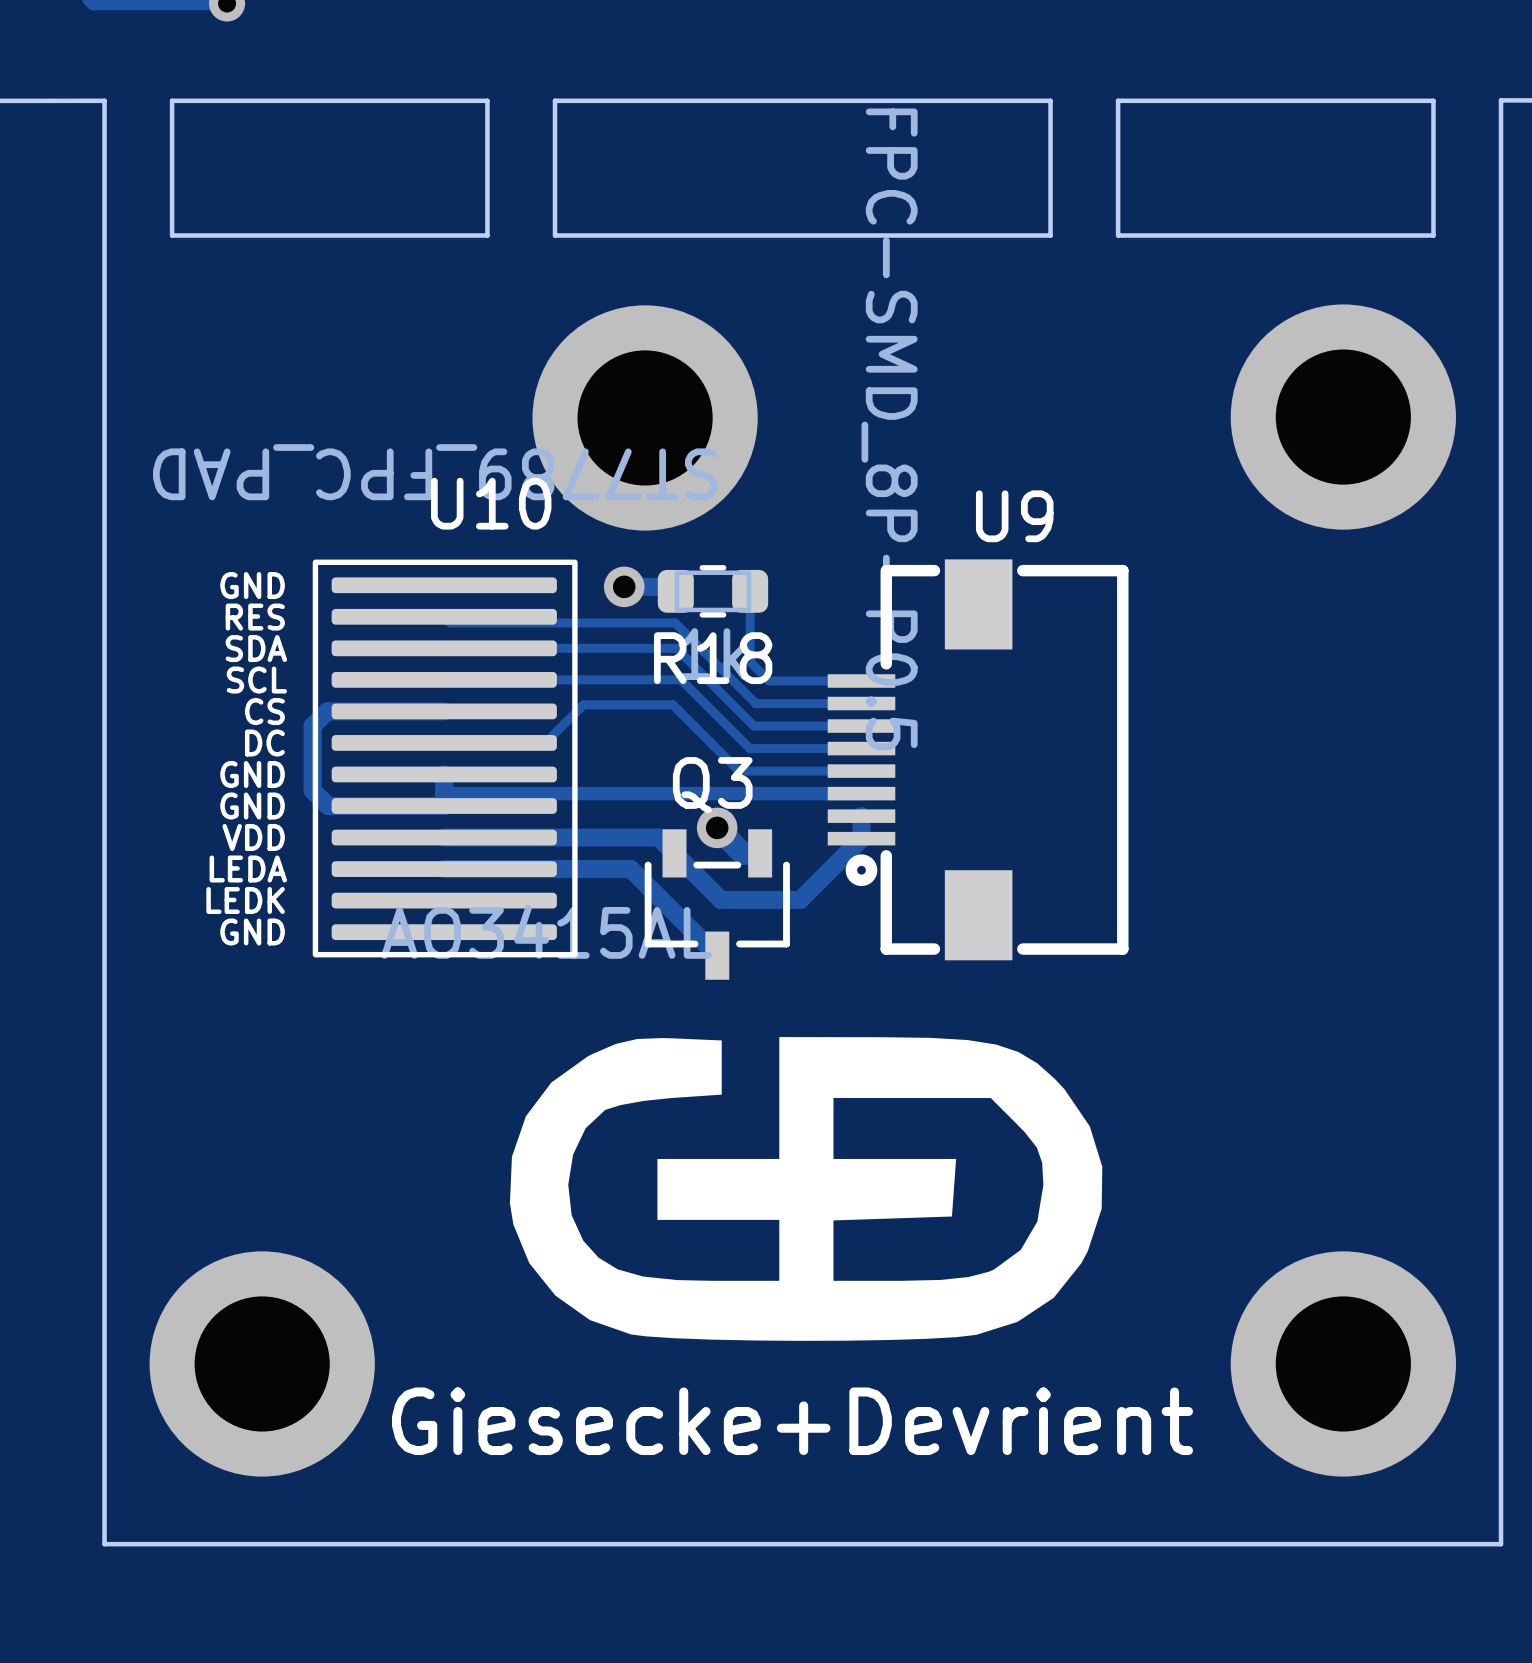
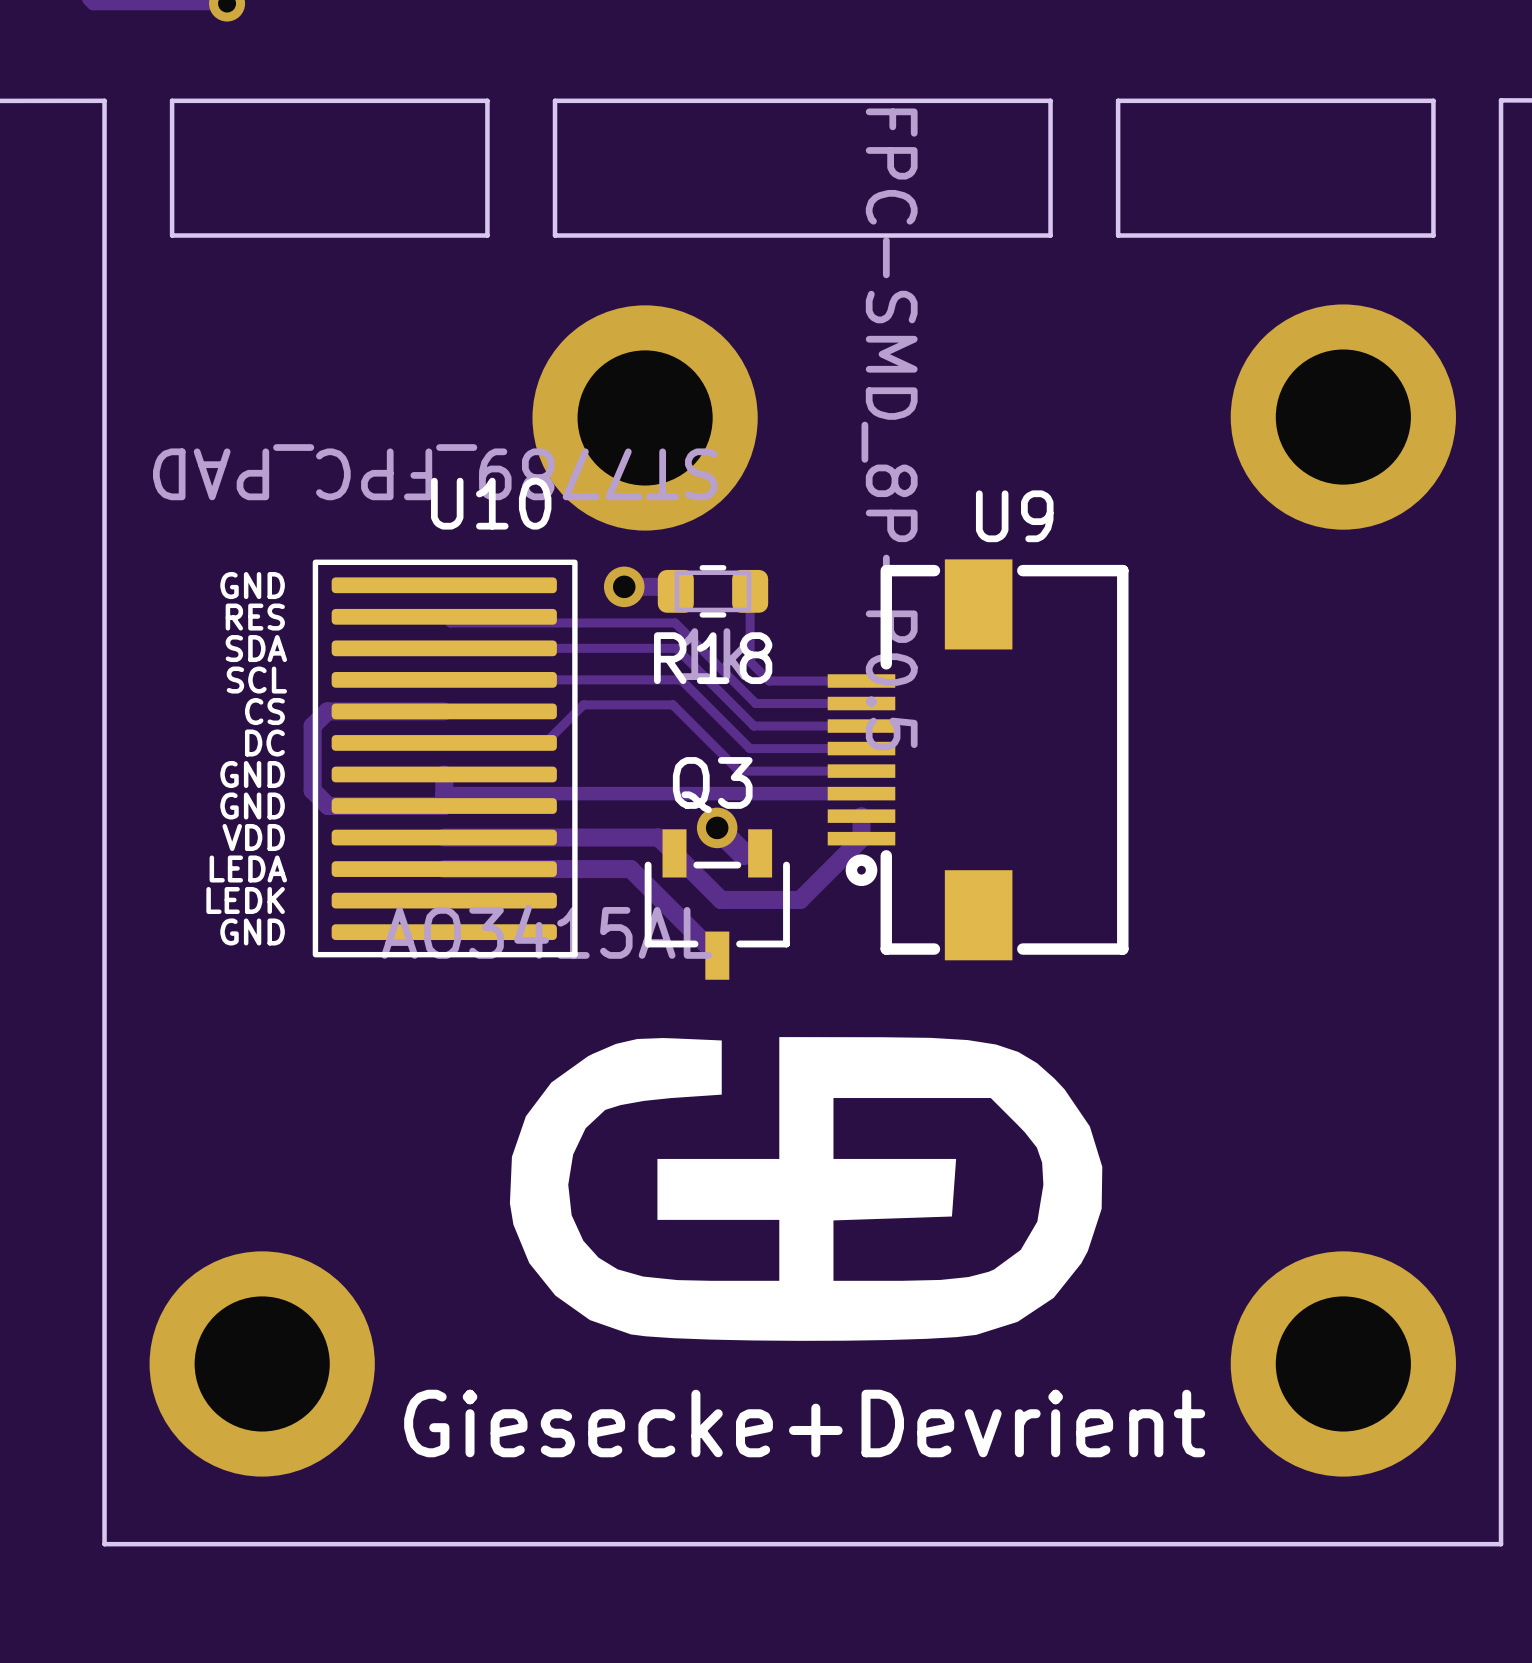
text position: Giesecke+Devrient (792, 1421) -> Giesecke+Devrient (804, 1423)

